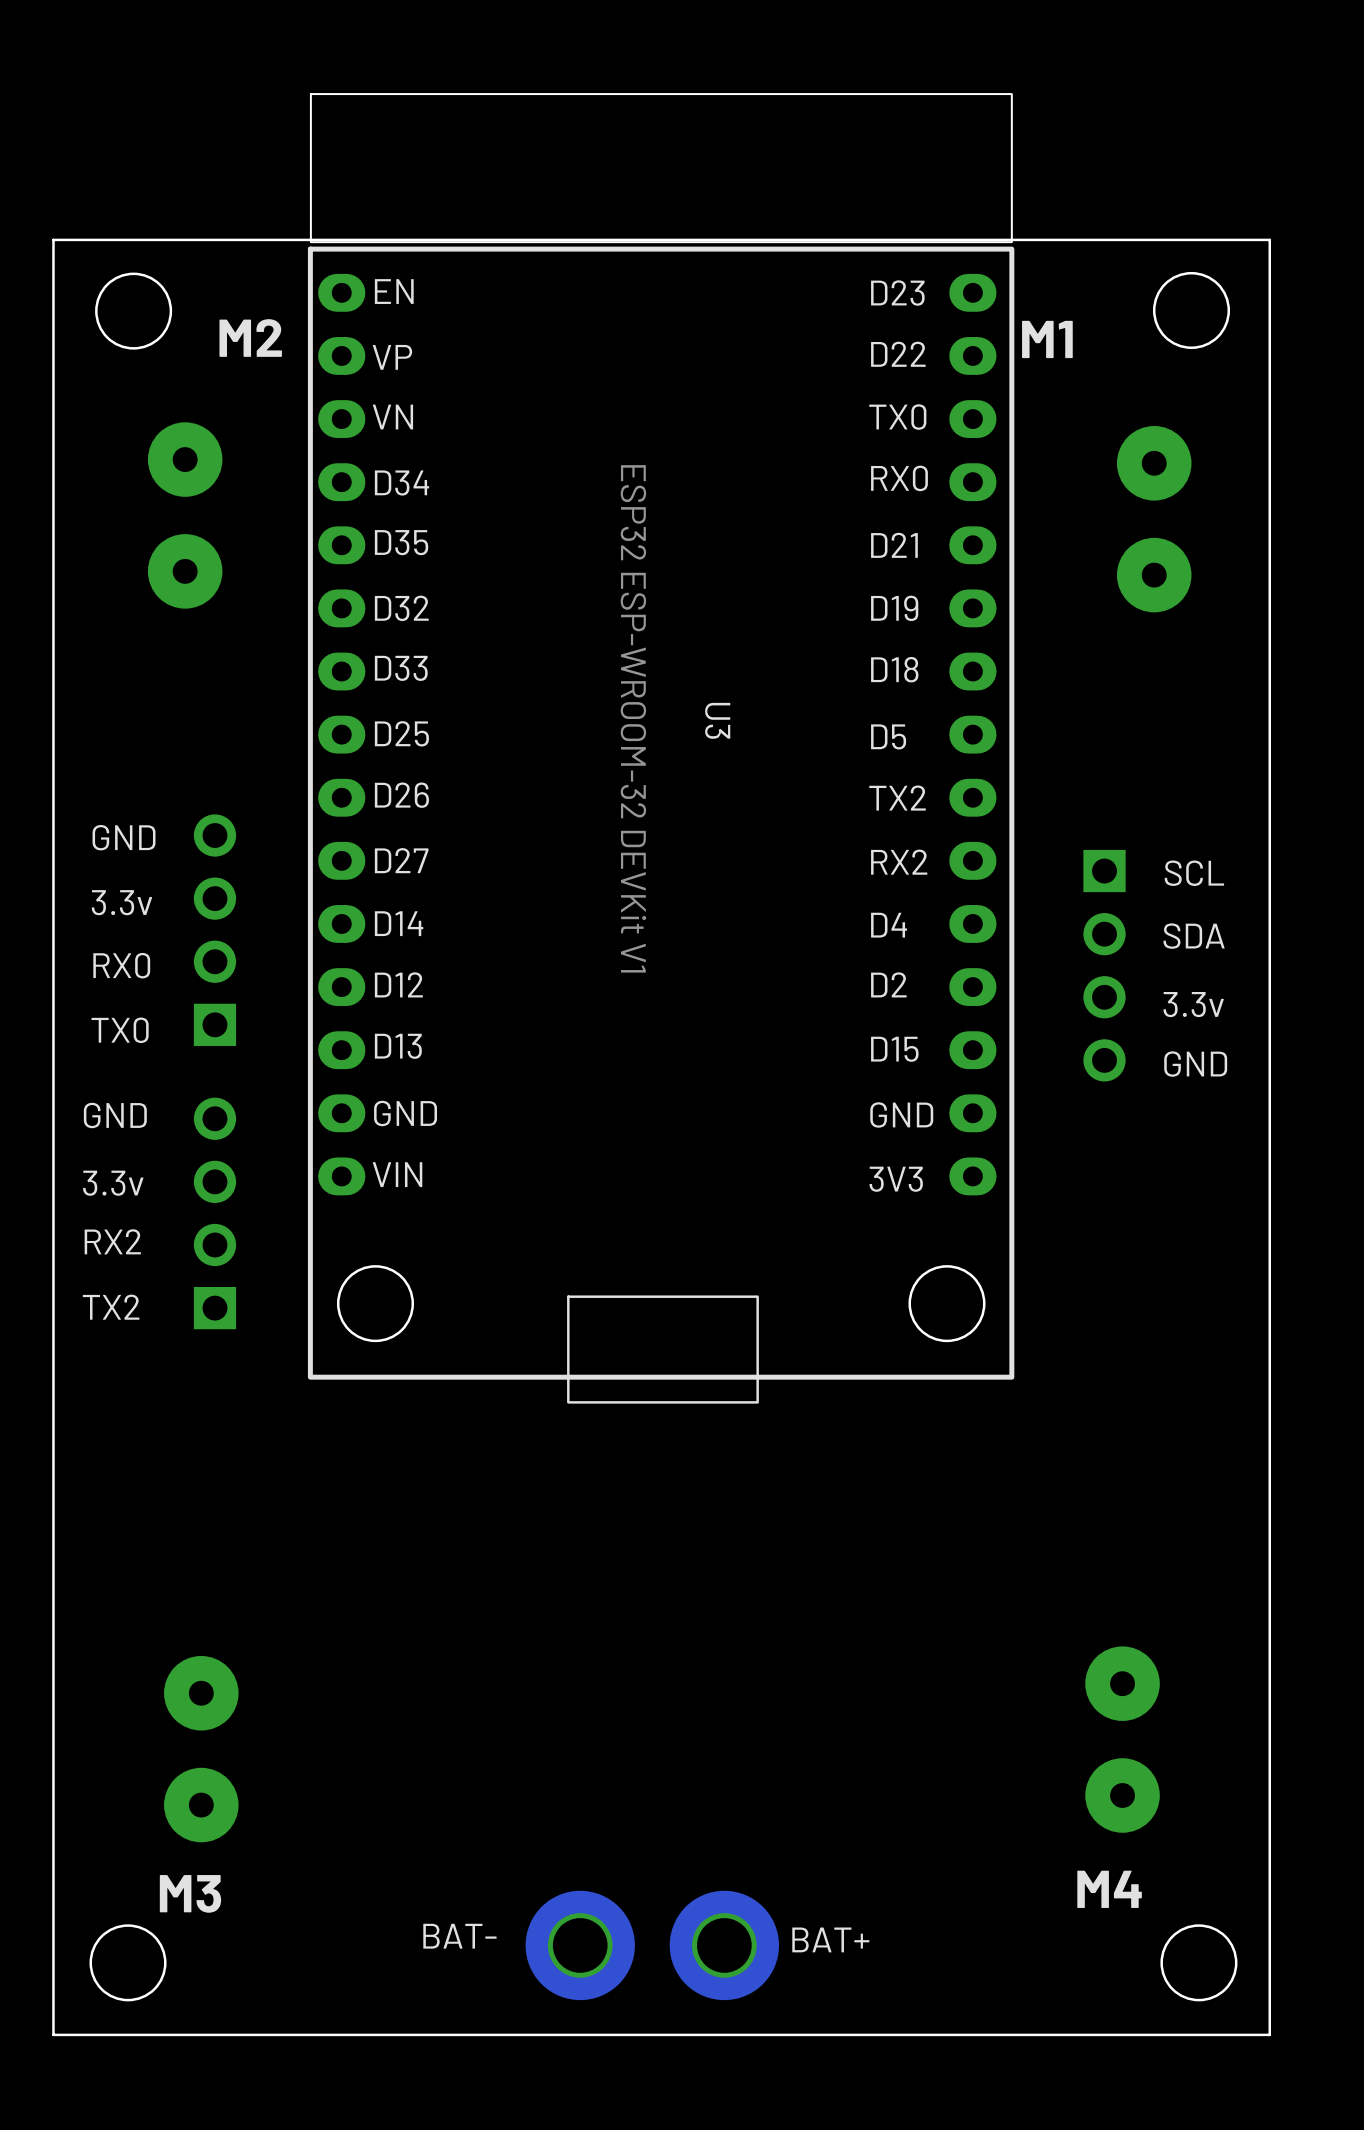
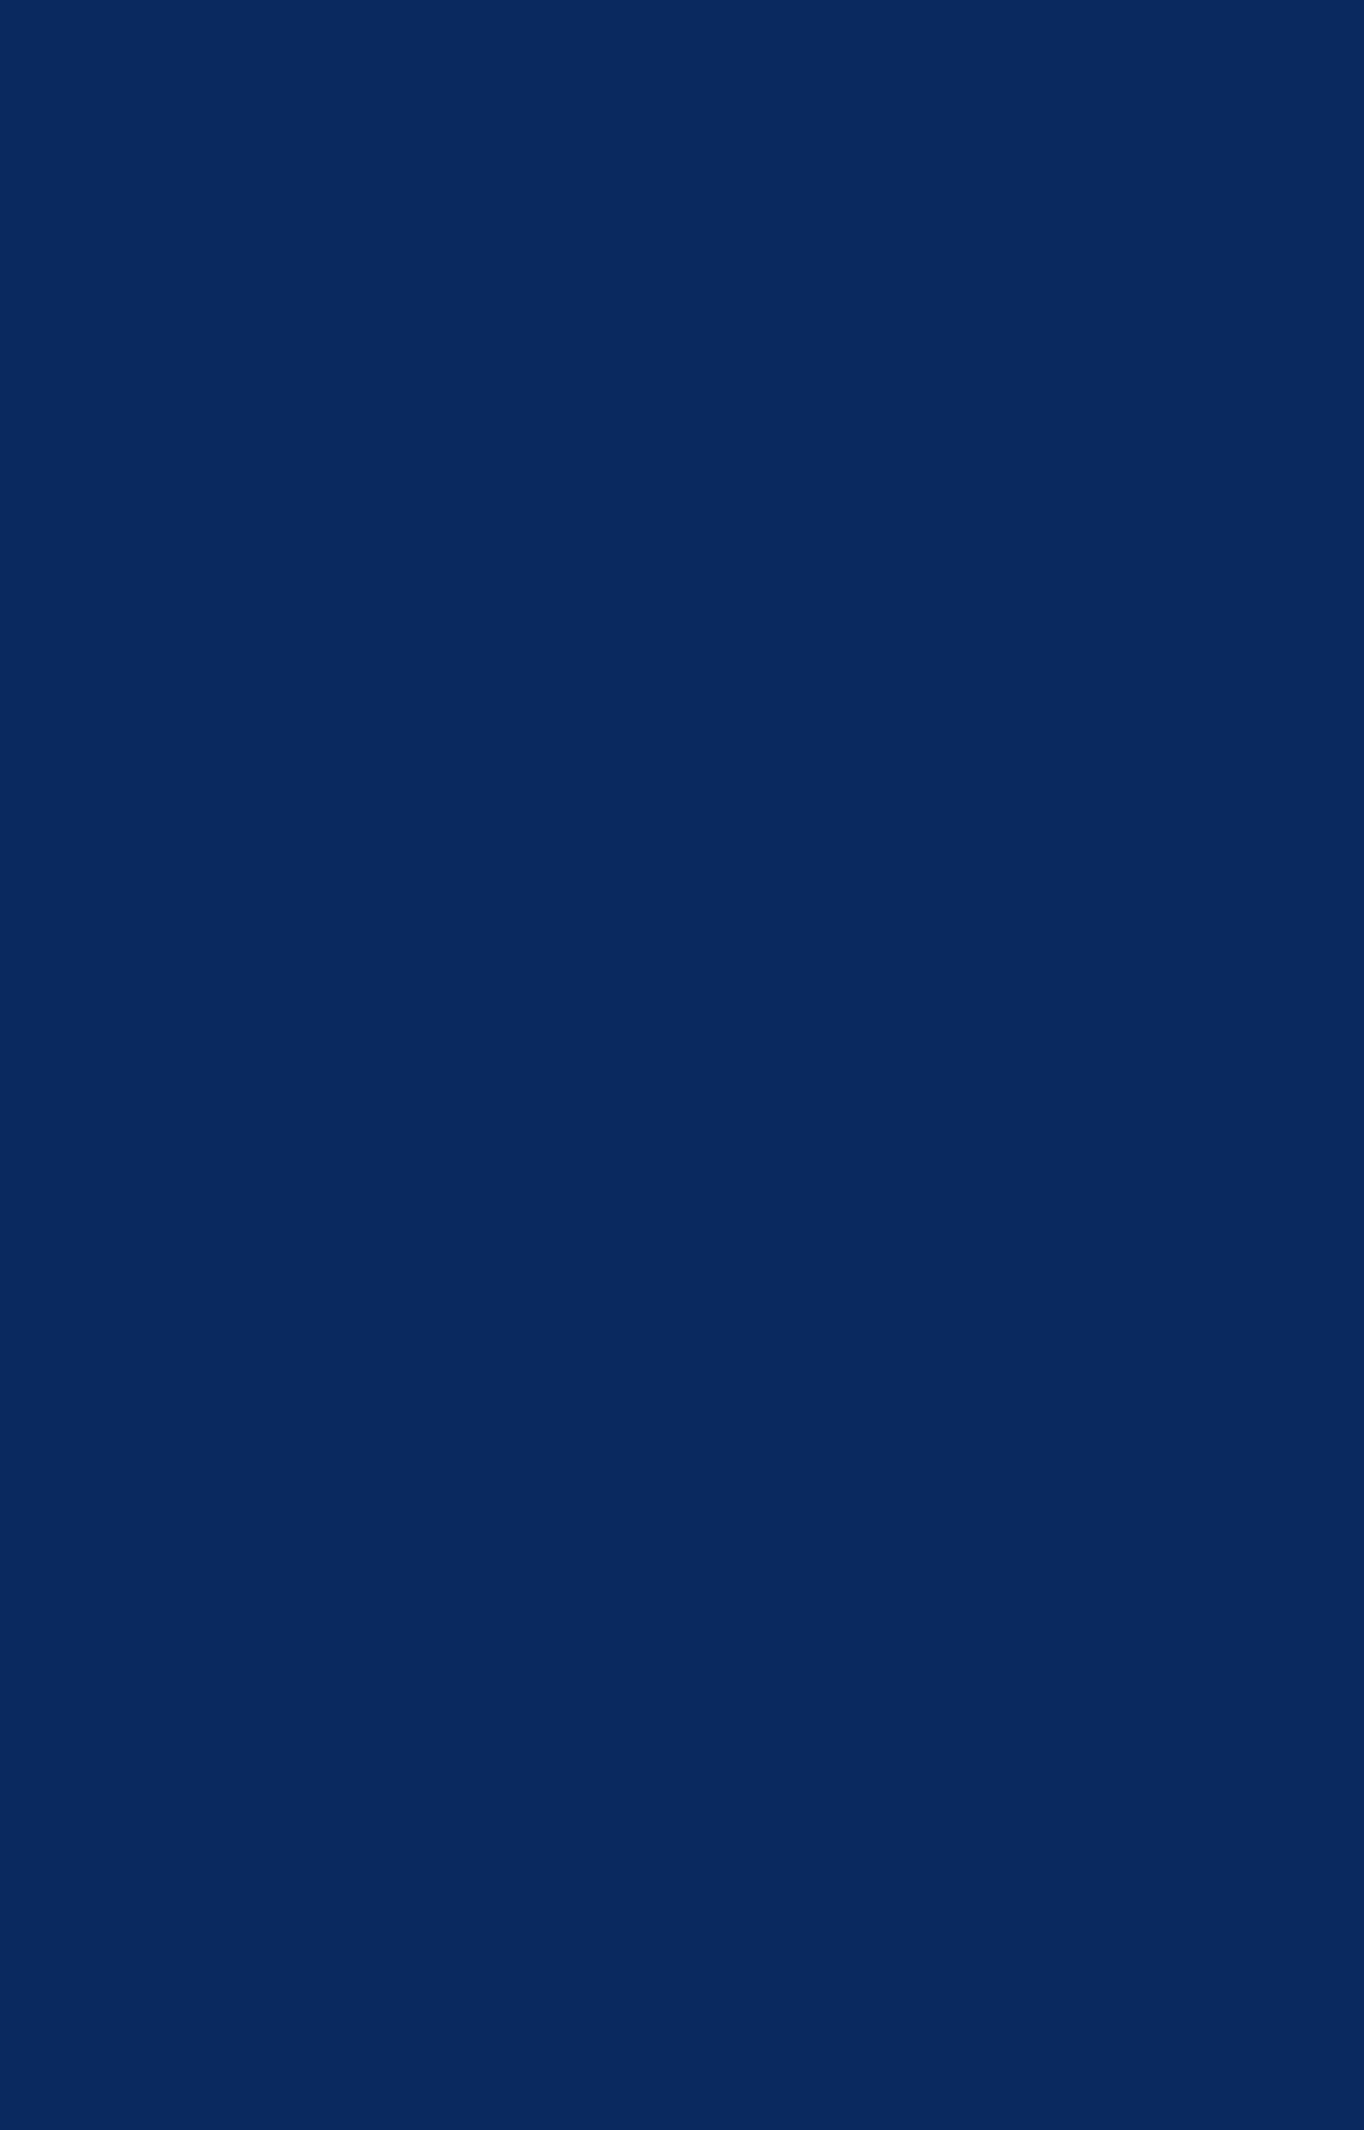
board edge: (1269, 239) (53, 239) (53, 2034) (1269, 2034) (1269, 239) -> none
round board edge: [1152, 271, 1231, 349] -> none
round board edge: [95, 272, 173, 350] -> none
text: M2 (250, 338) -> none
text: M1 (1047, 339) -> none
part: (185, 515) -> none
part: (1154, 519) -> none
U3: ESP32 ESP-WROOM-32 DEVKit V1 (661, 748) -> none
text: GND (124, 837) -> none
text: SCL (1194, 873) -> none
text: 3.3v (122, 902) -> none
part: (214, 930) -> none
text: SDA (1194, 936) -> none
text: RX0 (121, 965) -> none
part: (1104, 965) -> none
text: 3.3v (1193, 1004) -> none
text: TX0 (120, 1030) -> none
text: GND (1195, 1064) -> none
text: GND (115, 1115) -> none
text: 3.3v (113, 1183) -> none
part: (214, 1213) -> none
text: RX2 (112, 1241) -> none
text: TX2 (111, 1307) -> none
part: (1122, 1739) -> none
part: (201, 1749) -> none
text: M4 (1109, 1889) -> none
text: M3 (190, 1893) -> none
round board edge: [89, 1924, 167, 2002] -> none
round board edge: [1160, 1924, 1238, 2002] -> none
text: BAT- (459, 1936) -> none
text: BAT+ (830, 1939) -> none
part: (580, 1945) -> none
part: (724, 1945) -> none

